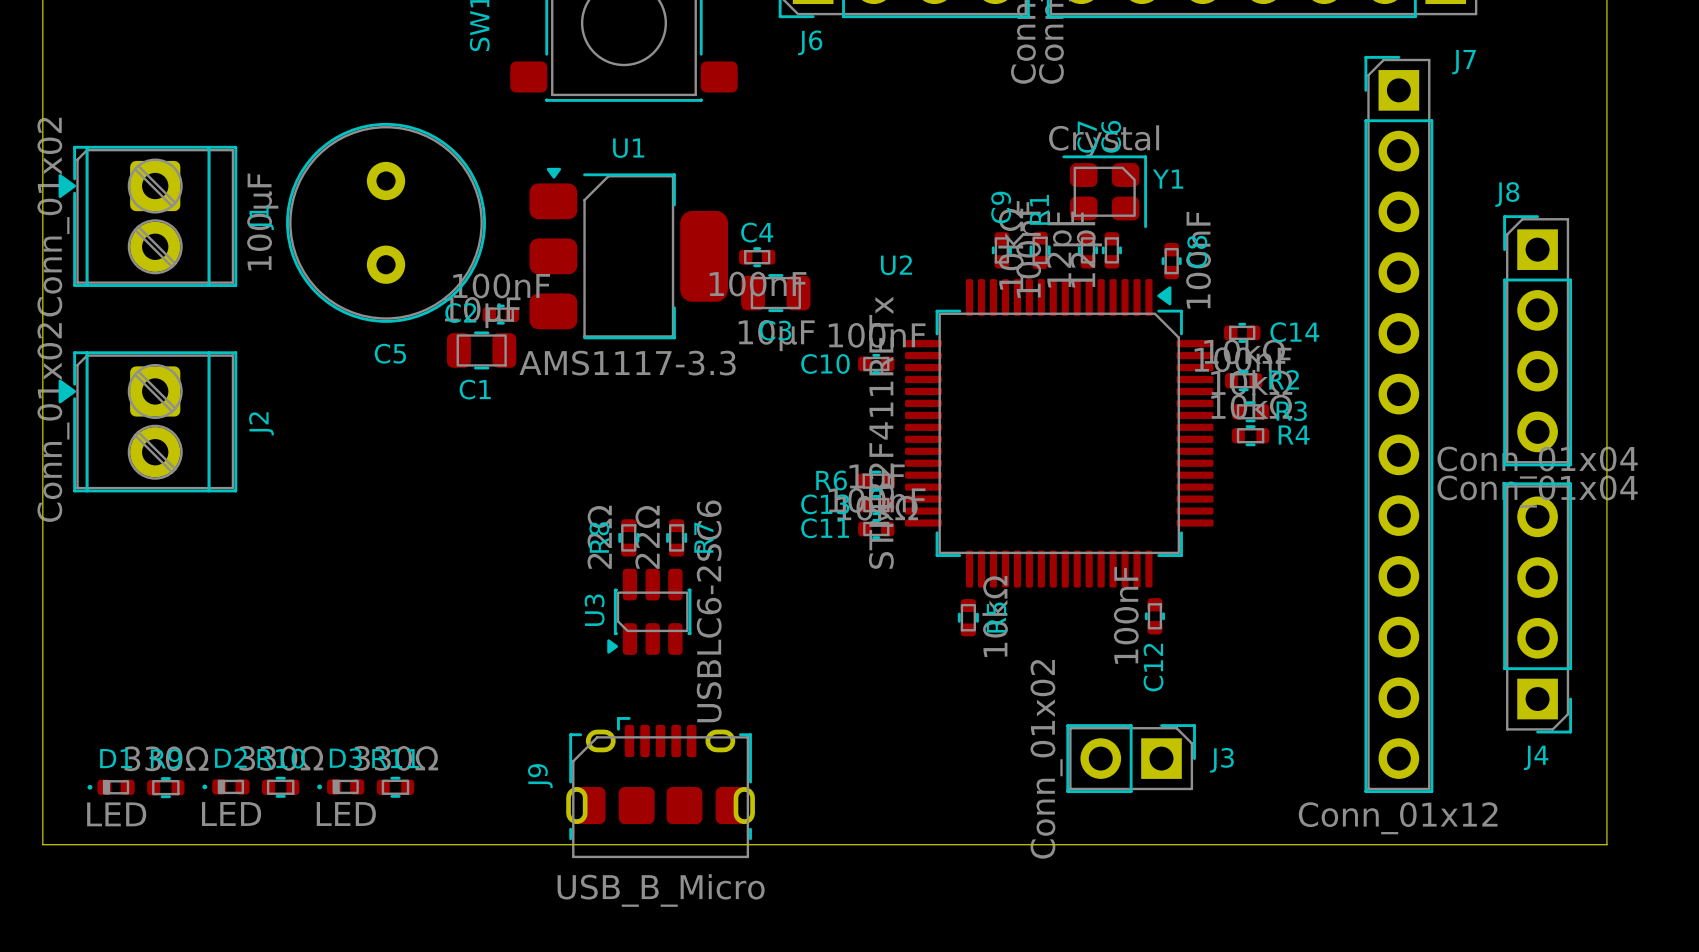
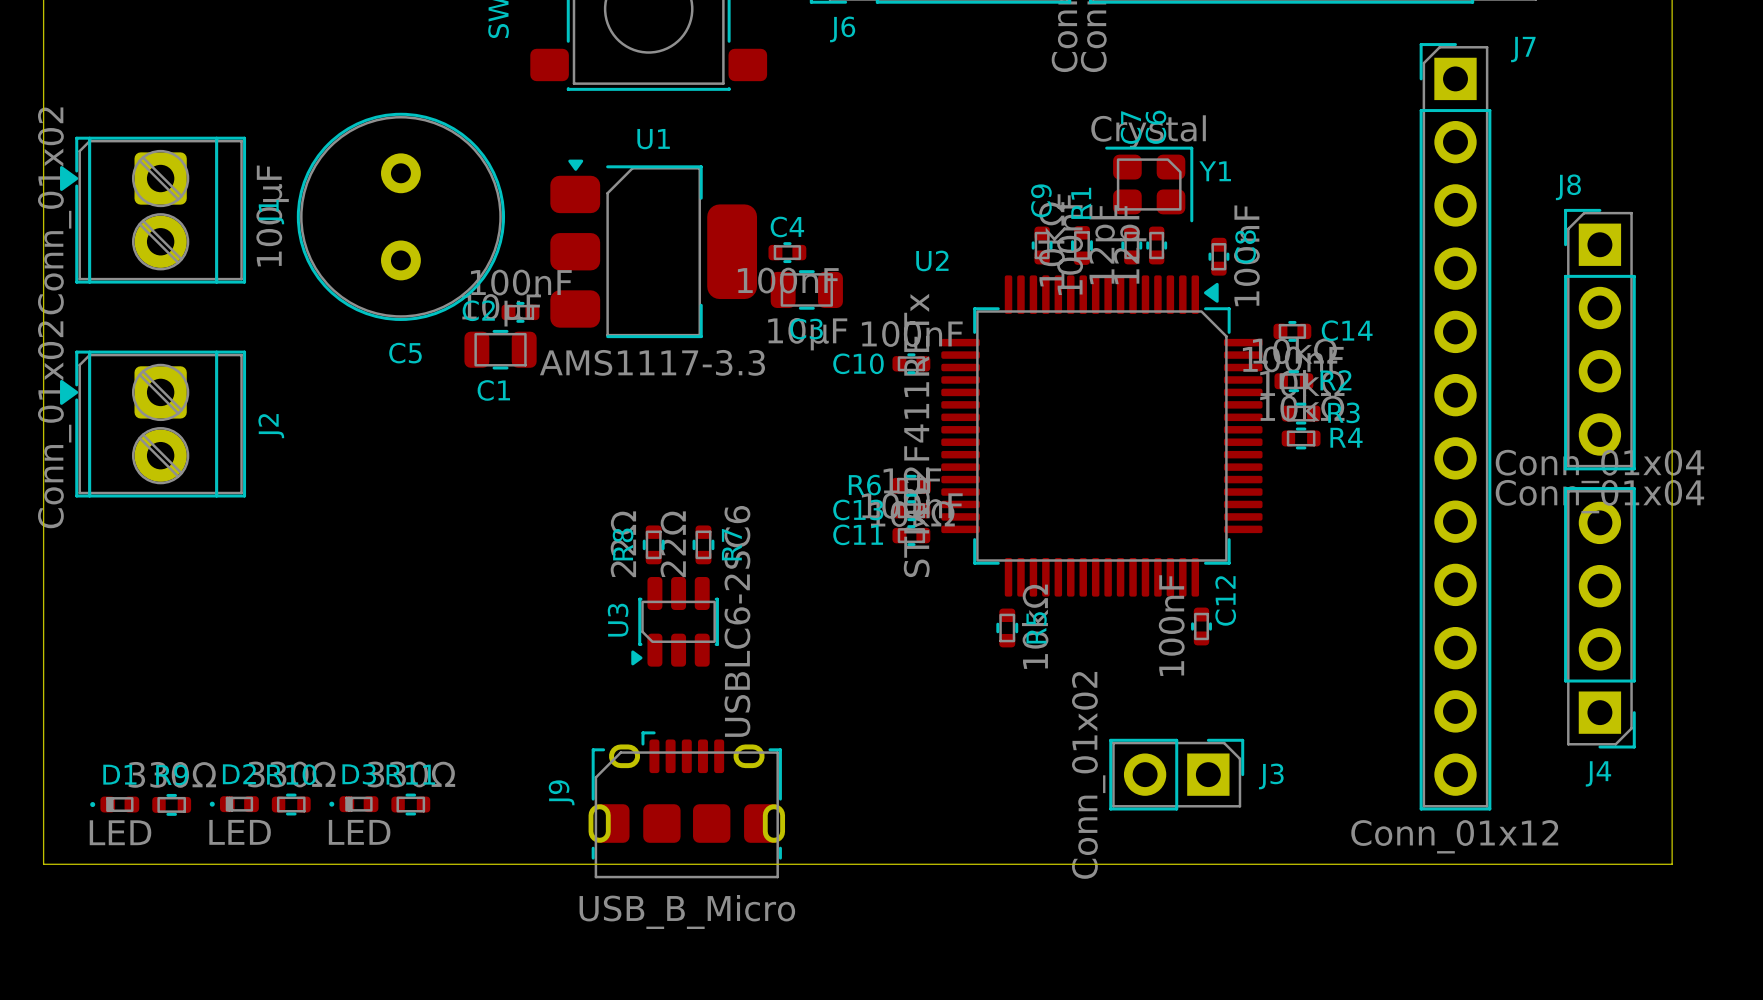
C12 name position: C12 (1153, 667) -> C12 (1225, 600)

